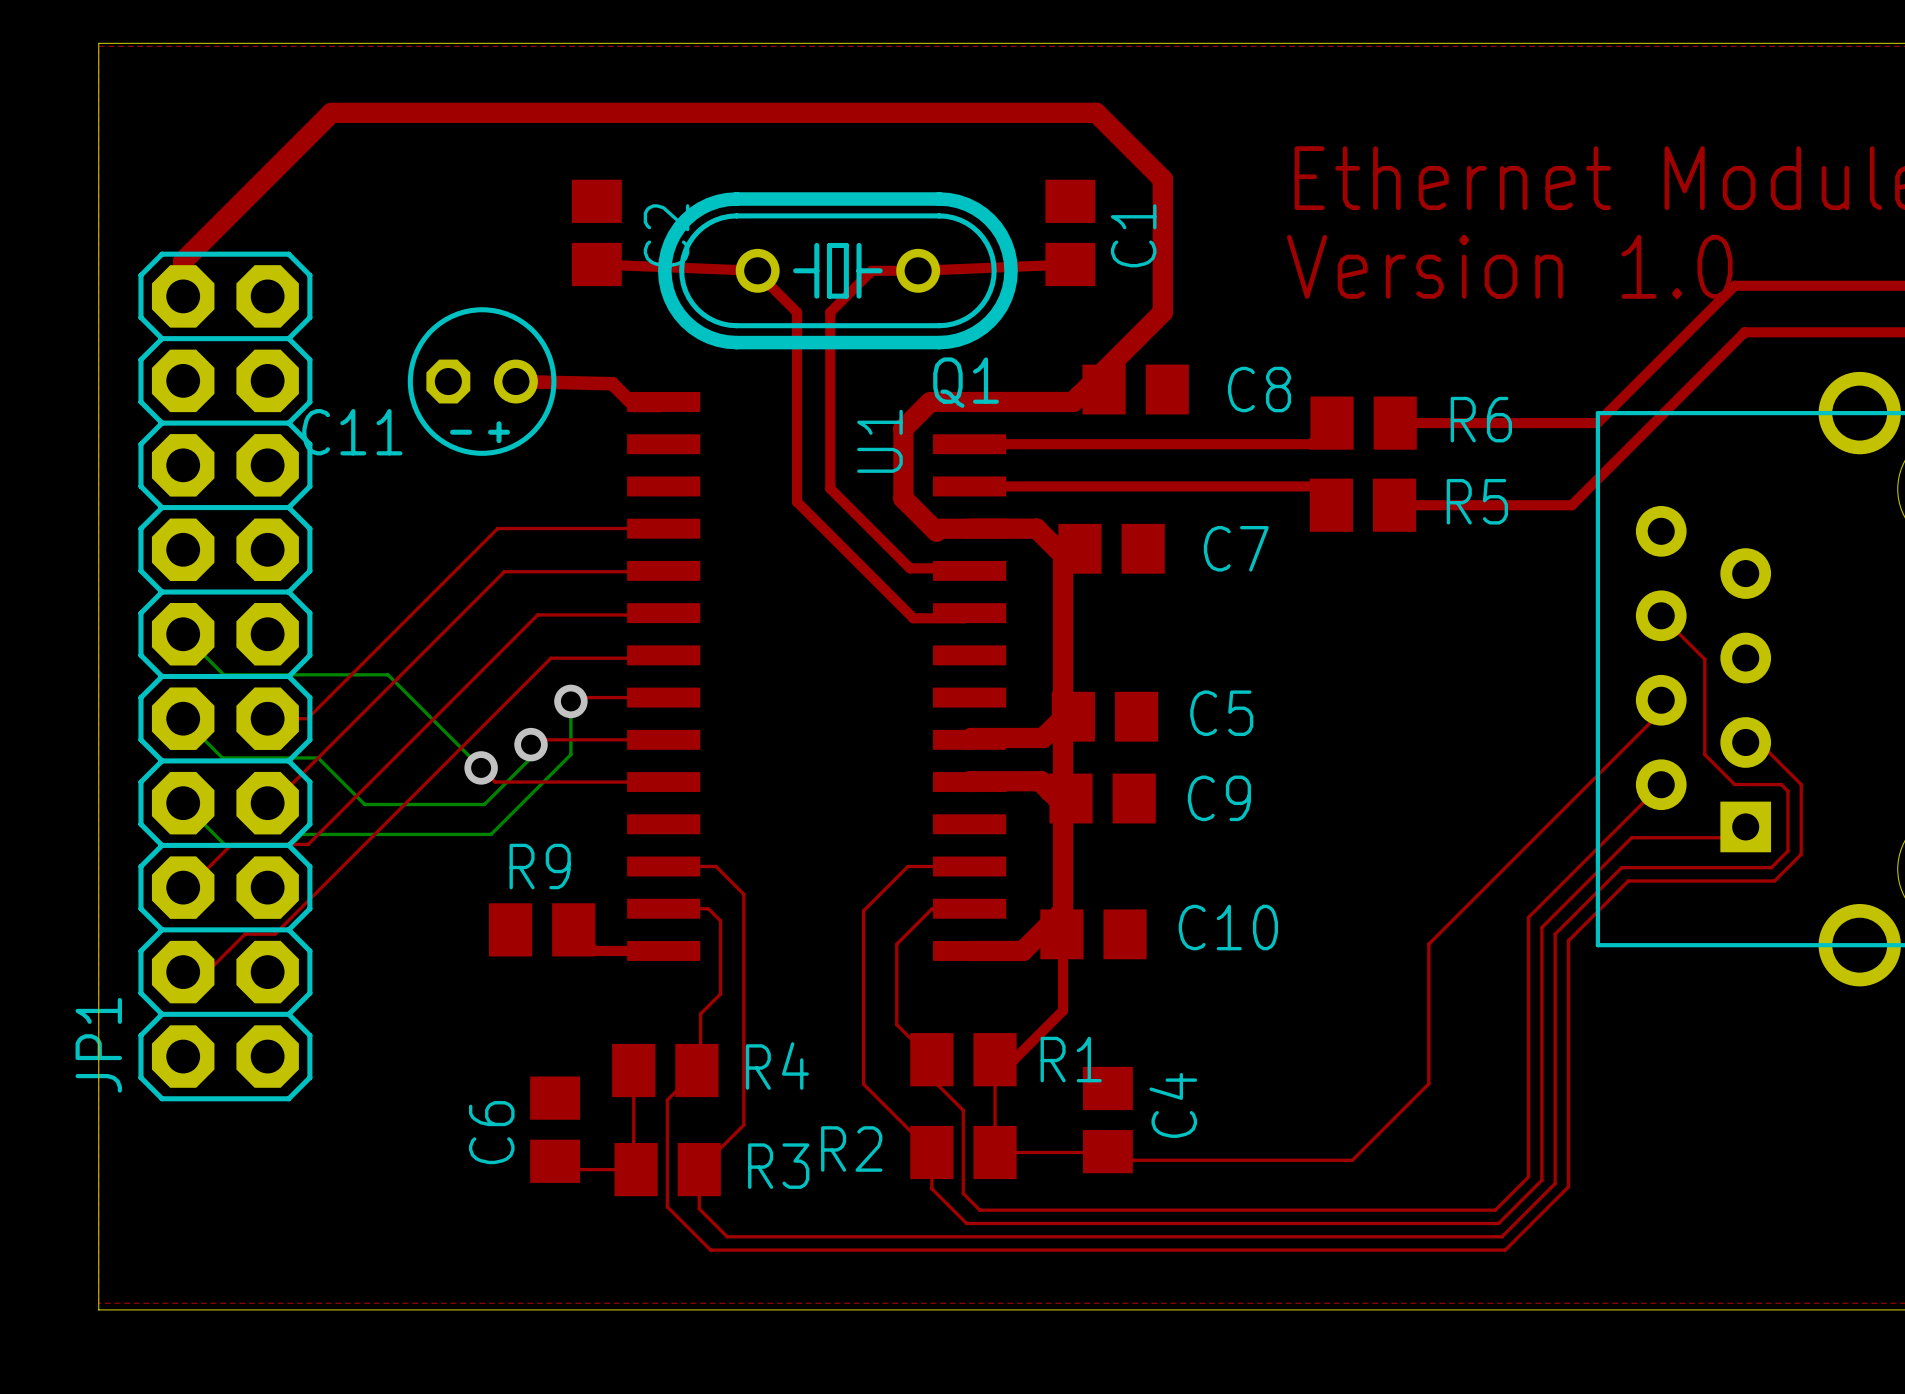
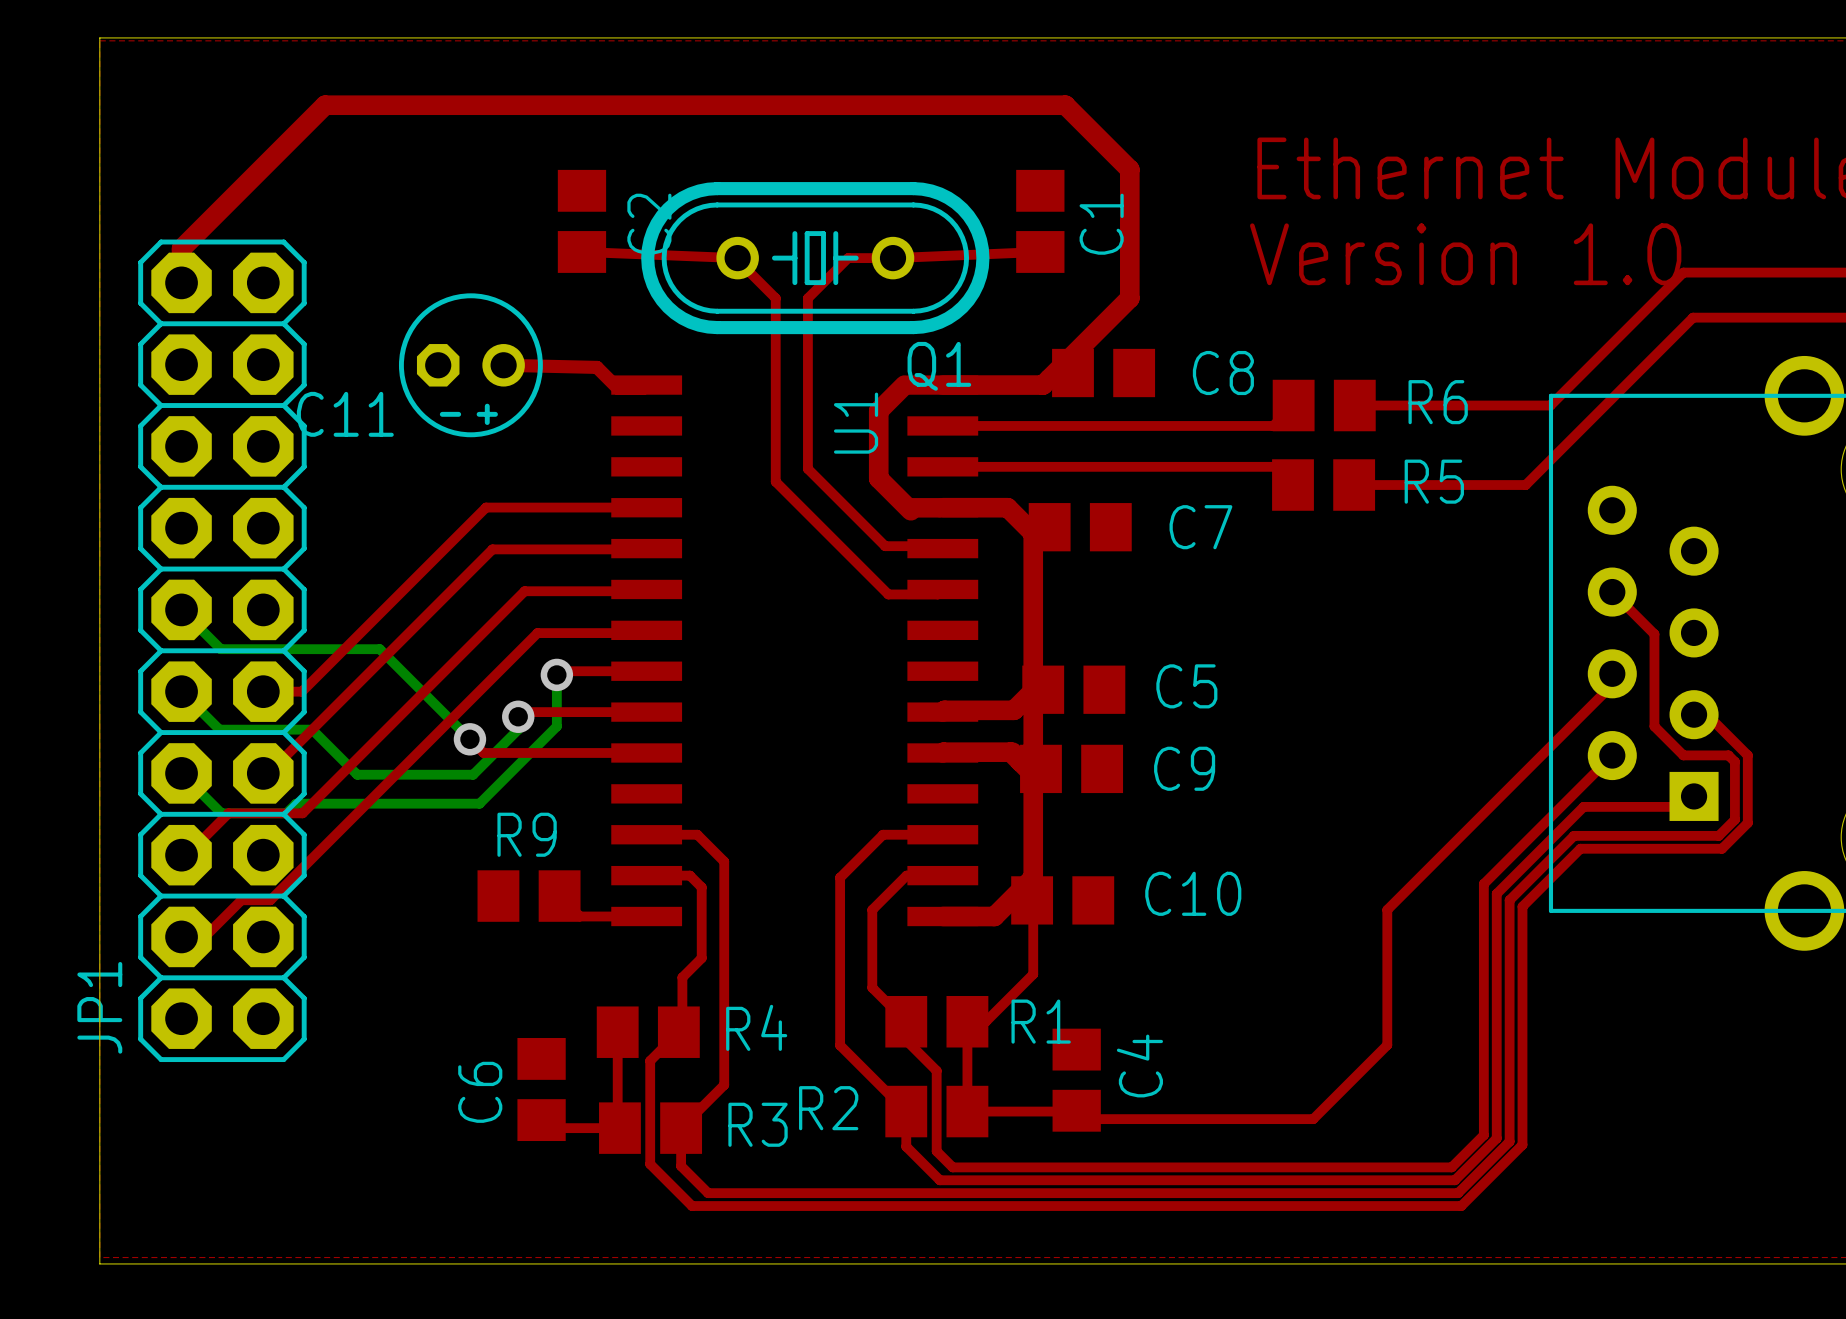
top track width: thin (663, 528) (497, 528) (307, 718) (267, 718) -> thick (646, 507) (486, 507) (301, 691) (263, 691)
top track width: thin (663, 570) (504, 571) (272, 803) (267, 803) -> thick (646, 548) (492, 549) (268, 773) (263, 773)
top track width: thin (663, 613) (661, 614) (537, 614) (308, 844) (231, 844) (188, 887) (183, 887) -> thick (646, 589) (644, 591) (524, 591) (302, 813) (228, 813) (186, 855) (181, 855)
top track width: thin (1661, 615) (1704, 659) (1704, 754) (1734, 784) (1781, 784) (1787, 791) (1787, 851) (1771, 867) (1621, 867) (1555, 934) (1555, 1183) (1501, 1236) (727, 1236) (699, 1208) (699, 1169) (743, 1125) (743, 894) (716, 866) (663, 866) -> thick (1612, 592) (1654, 634) (1654, 726) (1683, 755) (1728, 755) (1734, 761) (1734, 819) (1718, 835) (1573, 835) (1509, 900) (1509, 1141) (1458, 1193) (708, 1193) (681, 1166) (681, 1128) (724, 1085) (724, 861) (697, 834) (646, 834)
bottom track width: thin (183, 634) (223, 674) (388, 674) (481, 767) -> thick (181, 609) (220, 649) (379, 649) (469, 739)
top track width: thin (663, 655) (660, 658) (550, 658) (274, 934) (245, 934) (207, 972) (183, 972) -> thick (646, 630) (643, 633) (537, 633) (270, 900) (241, 900) (204, 936) (181, 936)
top track width: thin (663, 697) (574, 697) (570, 701) -> thick (646, 671) (560, 671) (556, 674)
top track width: thin (1661, 700) (1661, 711) (1428, 944) (1428, 1083) (1352, 1160) (1116, 1160) (1107, 1151) (995, 1152) (995, 1059) -> thick (1612, 673) (1612, 684) (1387, 909) (1387, 1045) (1313, 1119) (1085, 1119) (1076, 1110) (967, 1111) (967, 1021)
bottom track width: thin (570, 701) (570, 754) (491, 834) (301, 834) (291, 844) (224, 844) (183, 803) -> thick (556, 674) (556, 726) (479, 803) (296, 803) (286, 813) (221, 813) (181, 773)
bottom track width: thin (183, 718) (222, 757) (318, 757) (364, 804) (484, 804) (531, 757) (531, 744) -> thick (181, 691) (219, 729) (312, 729) (357, 774) (473, 774) (518, 729) (518, 716)
top track width: thin (663, 739) (535, 739) (531, 744) -> thick (646, 712) (522, 712) (518, 716)
top track width: thin (1745, 742) (1759, 742) (1801, 784) (1801, 854) (1774, 880) (1628, 880) (1568, 940) (1568, 1186) (1505, 1250) (710, 1250) (667, 1206) (667, 1100) (700, 1066) (700, 1013) (720, 994) (720, 920) (708, 908) (663, 908) -> thick (1694, 714) (1707, 714) (1747, 755) (1747, 822) (1722, 848) (1580, 848) (1522, 906) (1522, 1144) (1461, 1206) (692, 1206) (650, 1164) (650, 1060) (682, 1028) (682, 977) (701, 958) (701, 887) (689, 875) (646, 875)
top track width: thin (481, 767) (495, 782) (663, 782) -> thick (469, 739) (483, 752) (646, 752)
top track width: thin (1661, 784) (1528, 917) (1528, 1176) (1495, 1210) (979, 1210) (963, 1193) (963, 1110) (931, 1078) (931, 1059) (896, 1024) (896, 944) (932, 908) (969, 908) -> thick (1612, 755) (1483, 883) (1483, 1135) (1451, 1167) (952, 1167) (936, 1151) (936, 1070) (906, 1040) (906, 1021) (872, 987) (872, 909) (906, 875) (942, 875)
top track width: thin (1745, 826) (1734, 837) (1631, 837) (1541, 927) (1541, 1180) (1498, 1223) (966, 1223) (931, 1188) (931, 1152) (863, 1084) (863, 910) (907, 866) (969, 866) -> thick (1694, 796) (1683, 806) (1583, 806) (1496, 893) (1496, 1138) (1454, 1180) (939, 1180) (906, 1146) (906, 1111) (840, 1045) (840, 877) (883, 834) (942, 834)
top track width: thin (633, 1070) (633, 1167) (636, 1169) (563, 1169) (555, 1161) -> thick (617, 1032) (617, 1125) (619, 1128) (549, 1128) (541, 1120)

